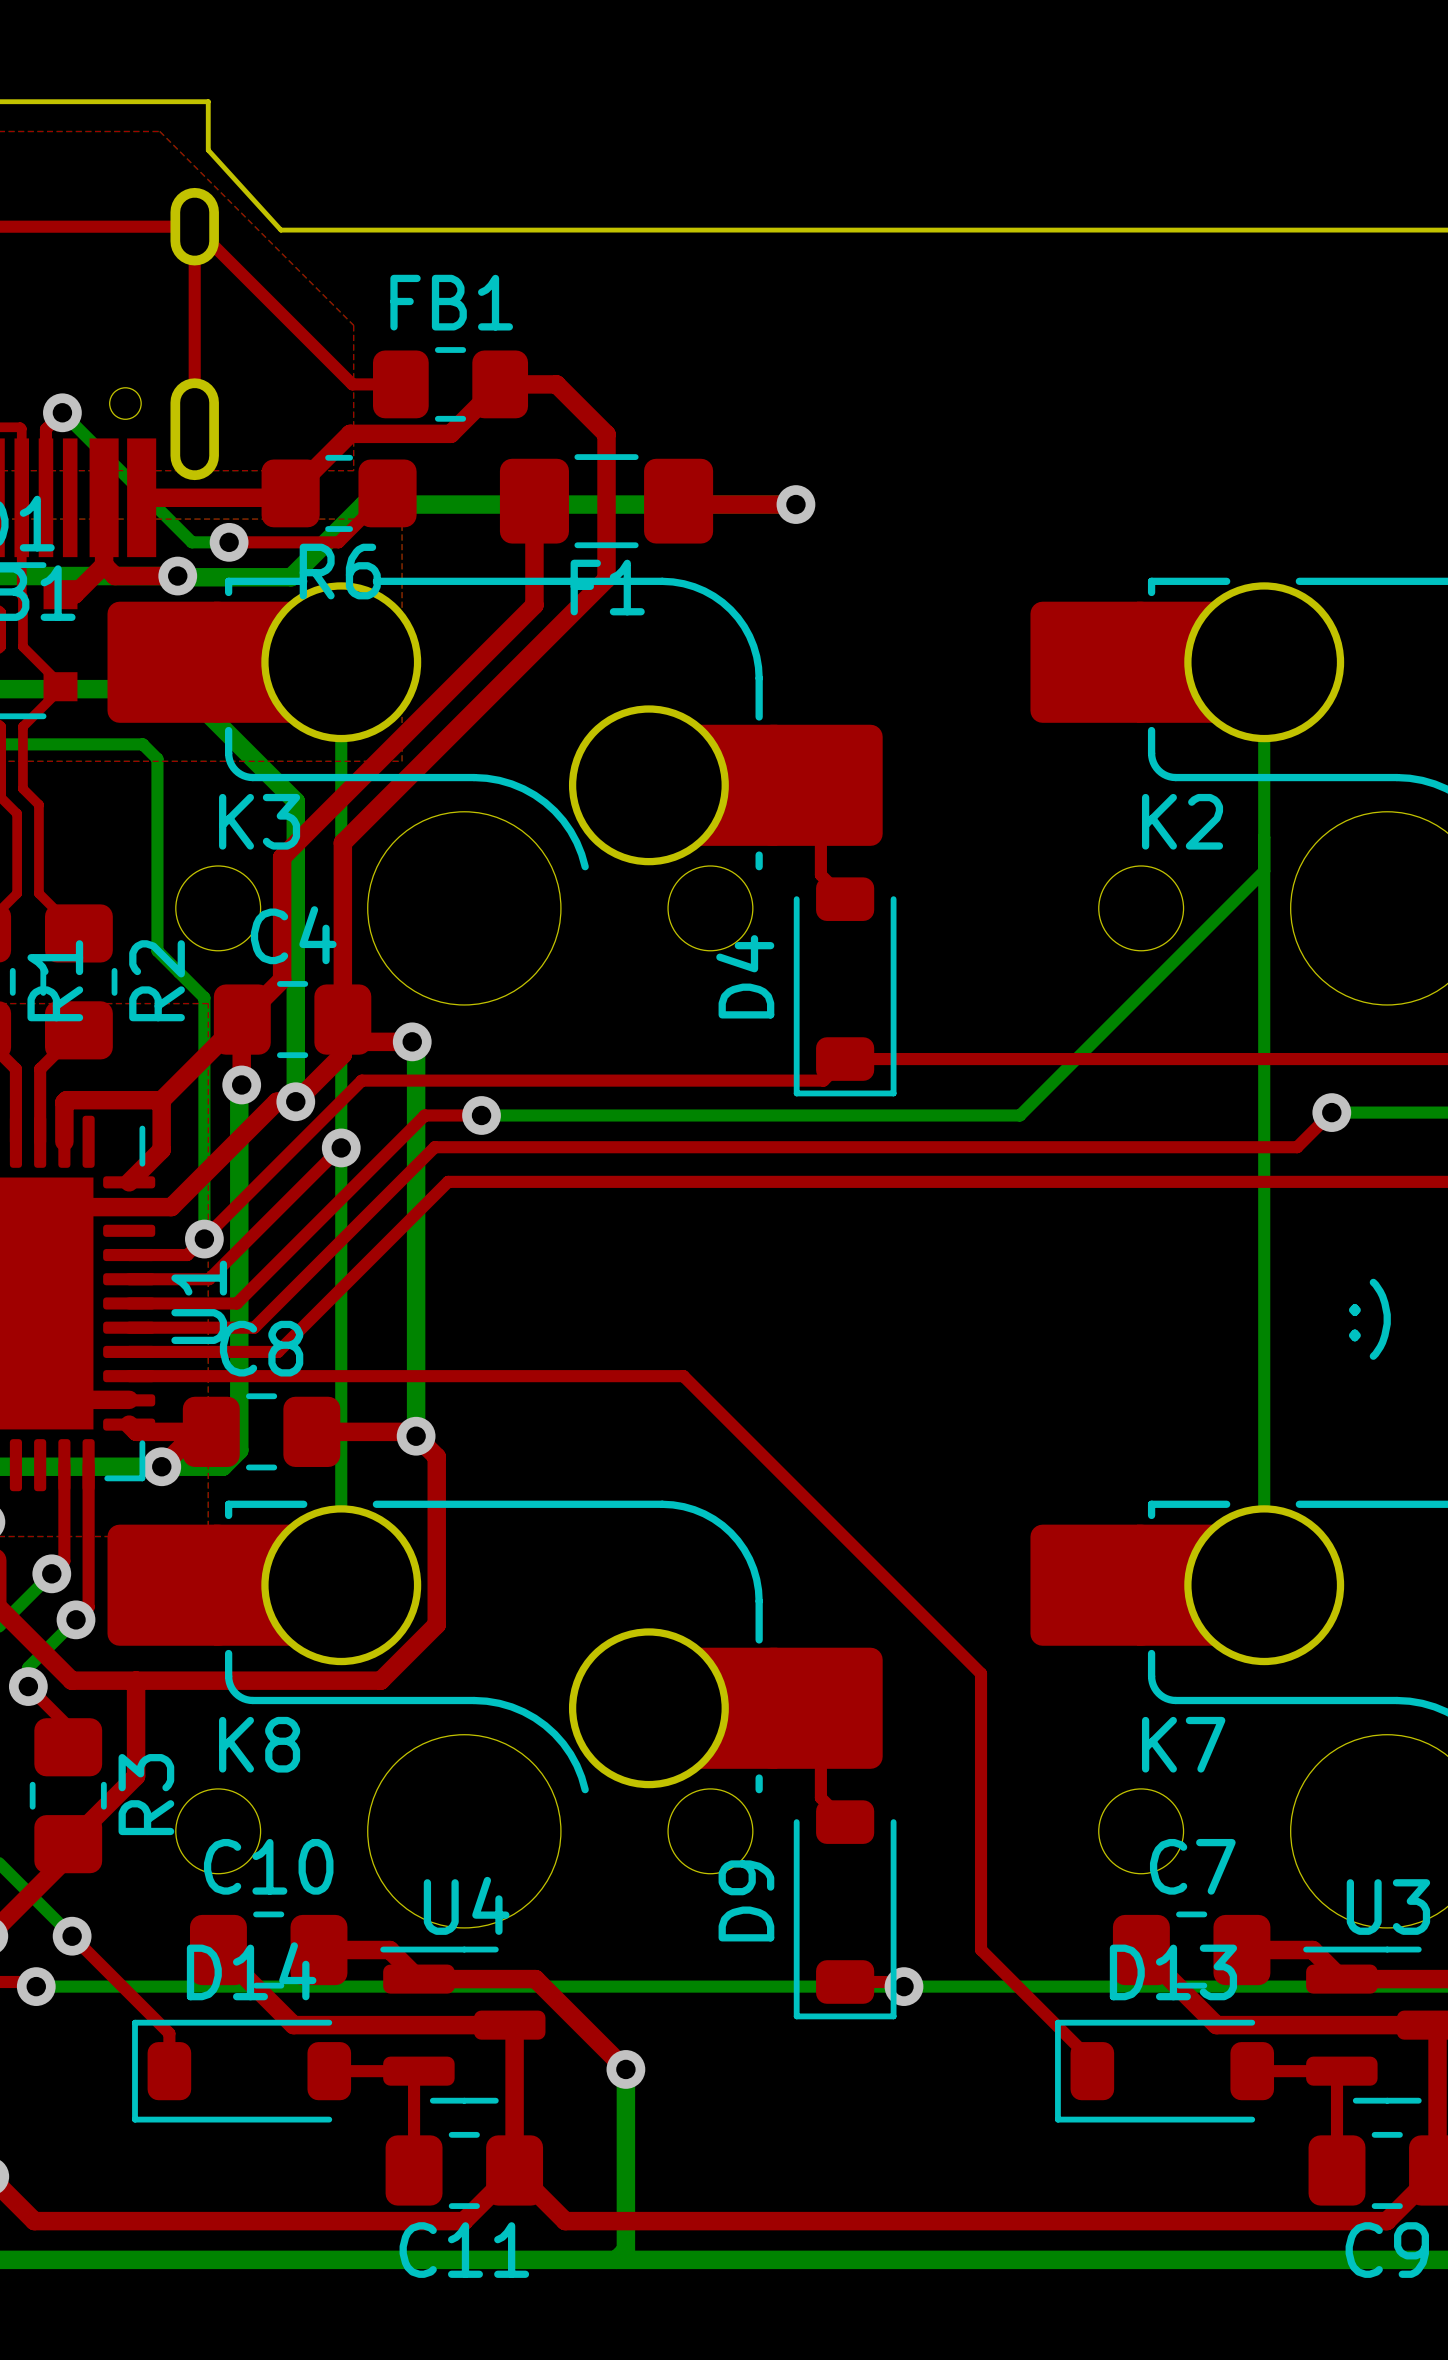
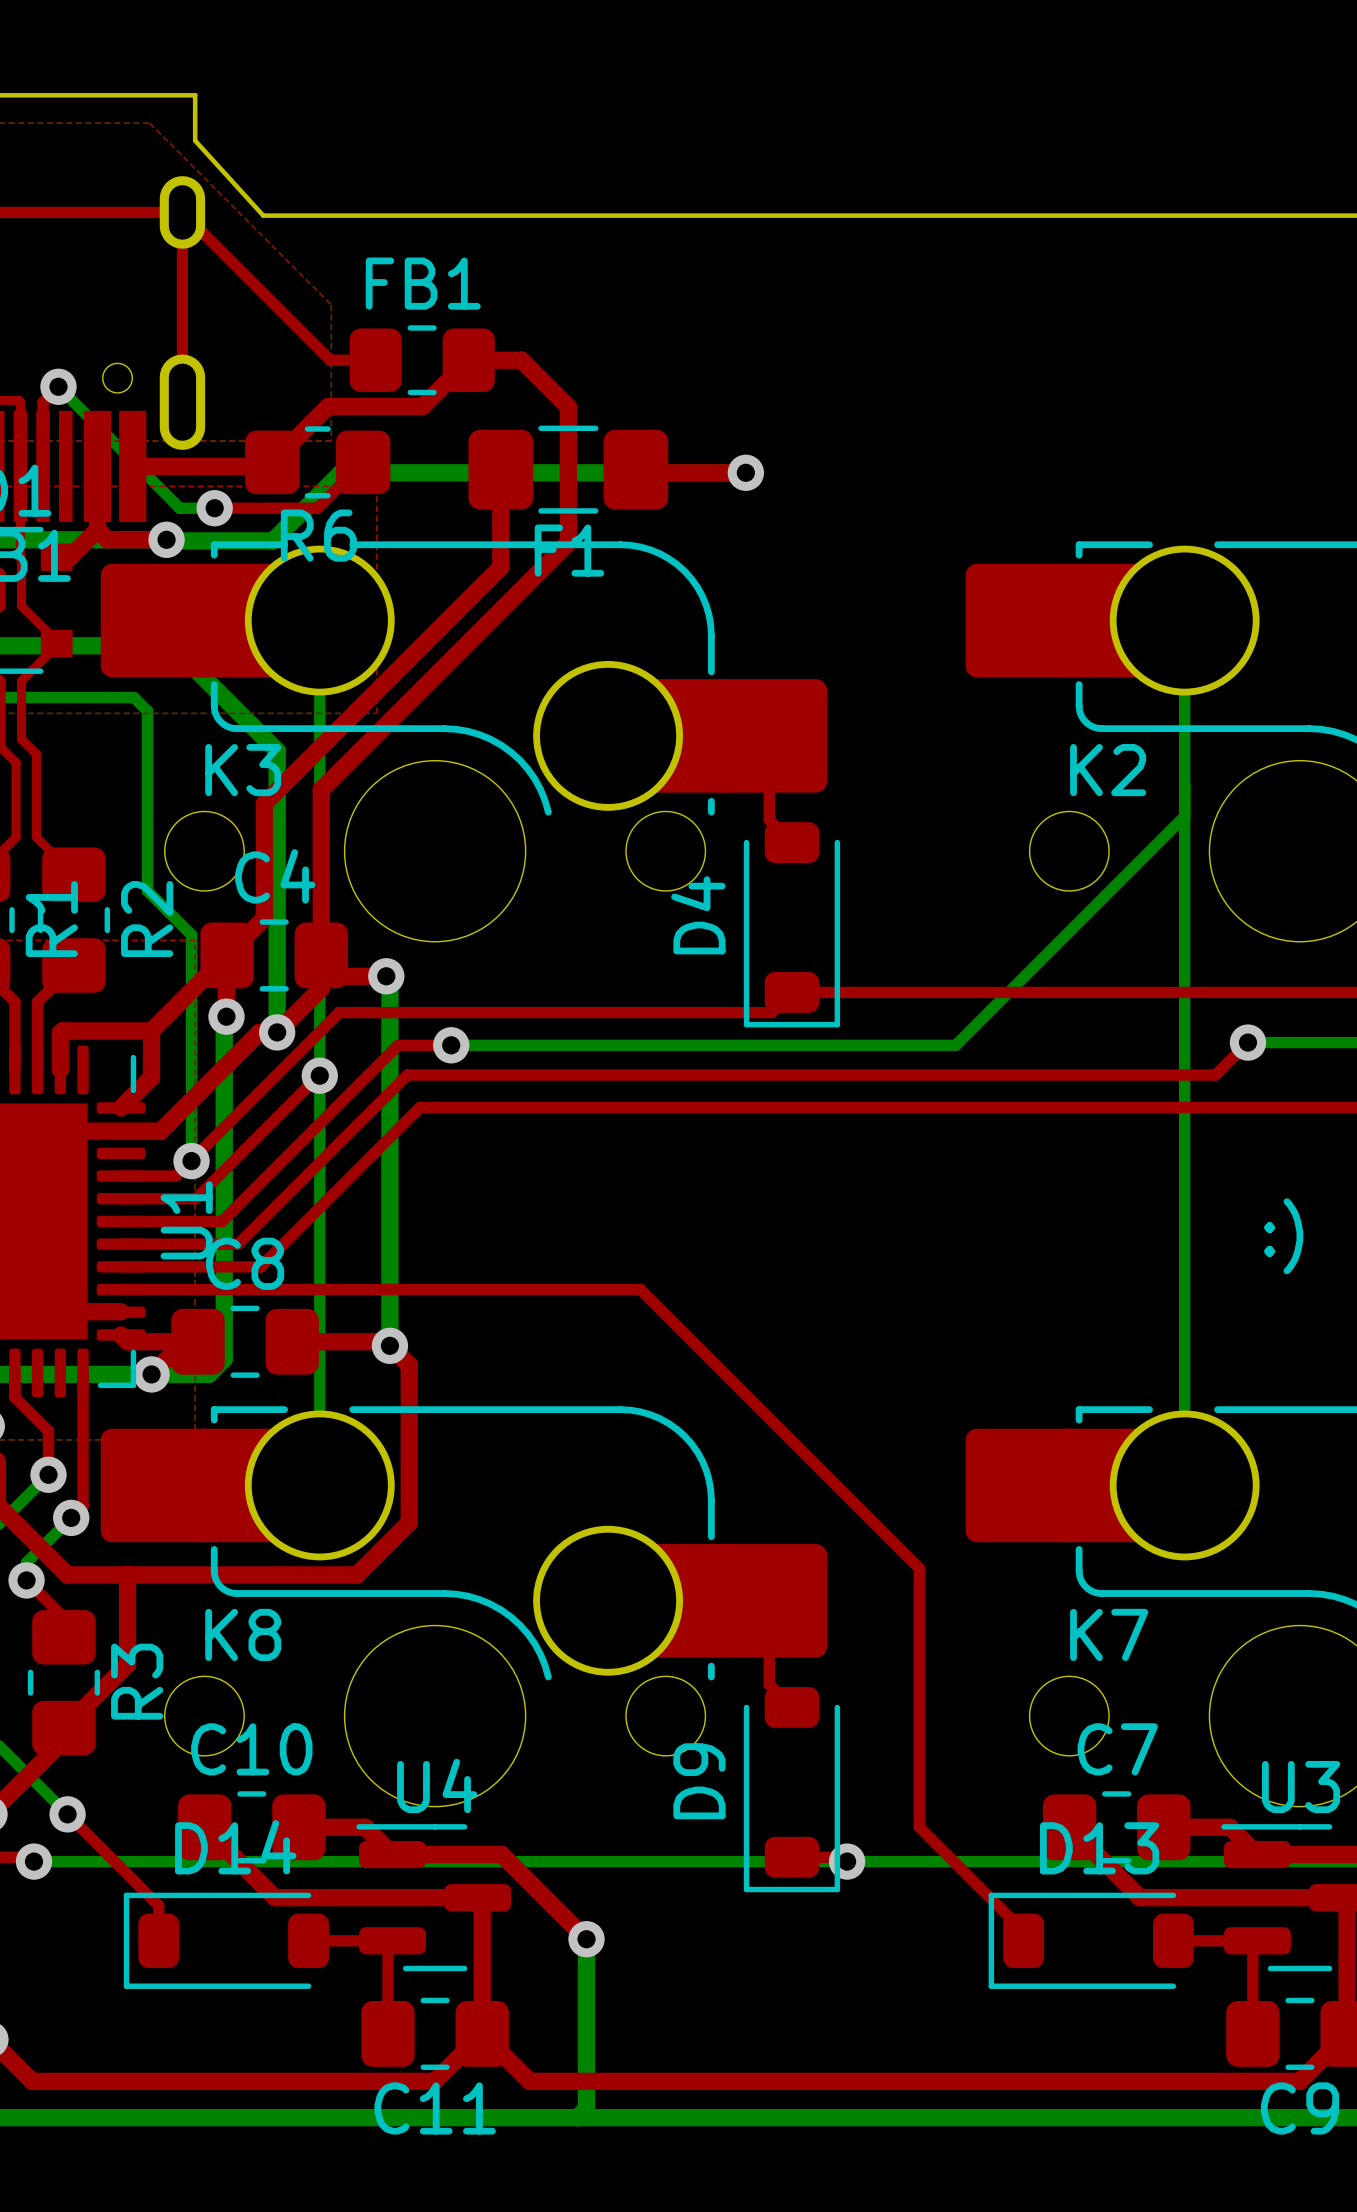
top track: (64, 1465) (64, 1561) (51, 1573) -> (14, 1372) (14, 1397) (48, 1430) (48, 1474)

